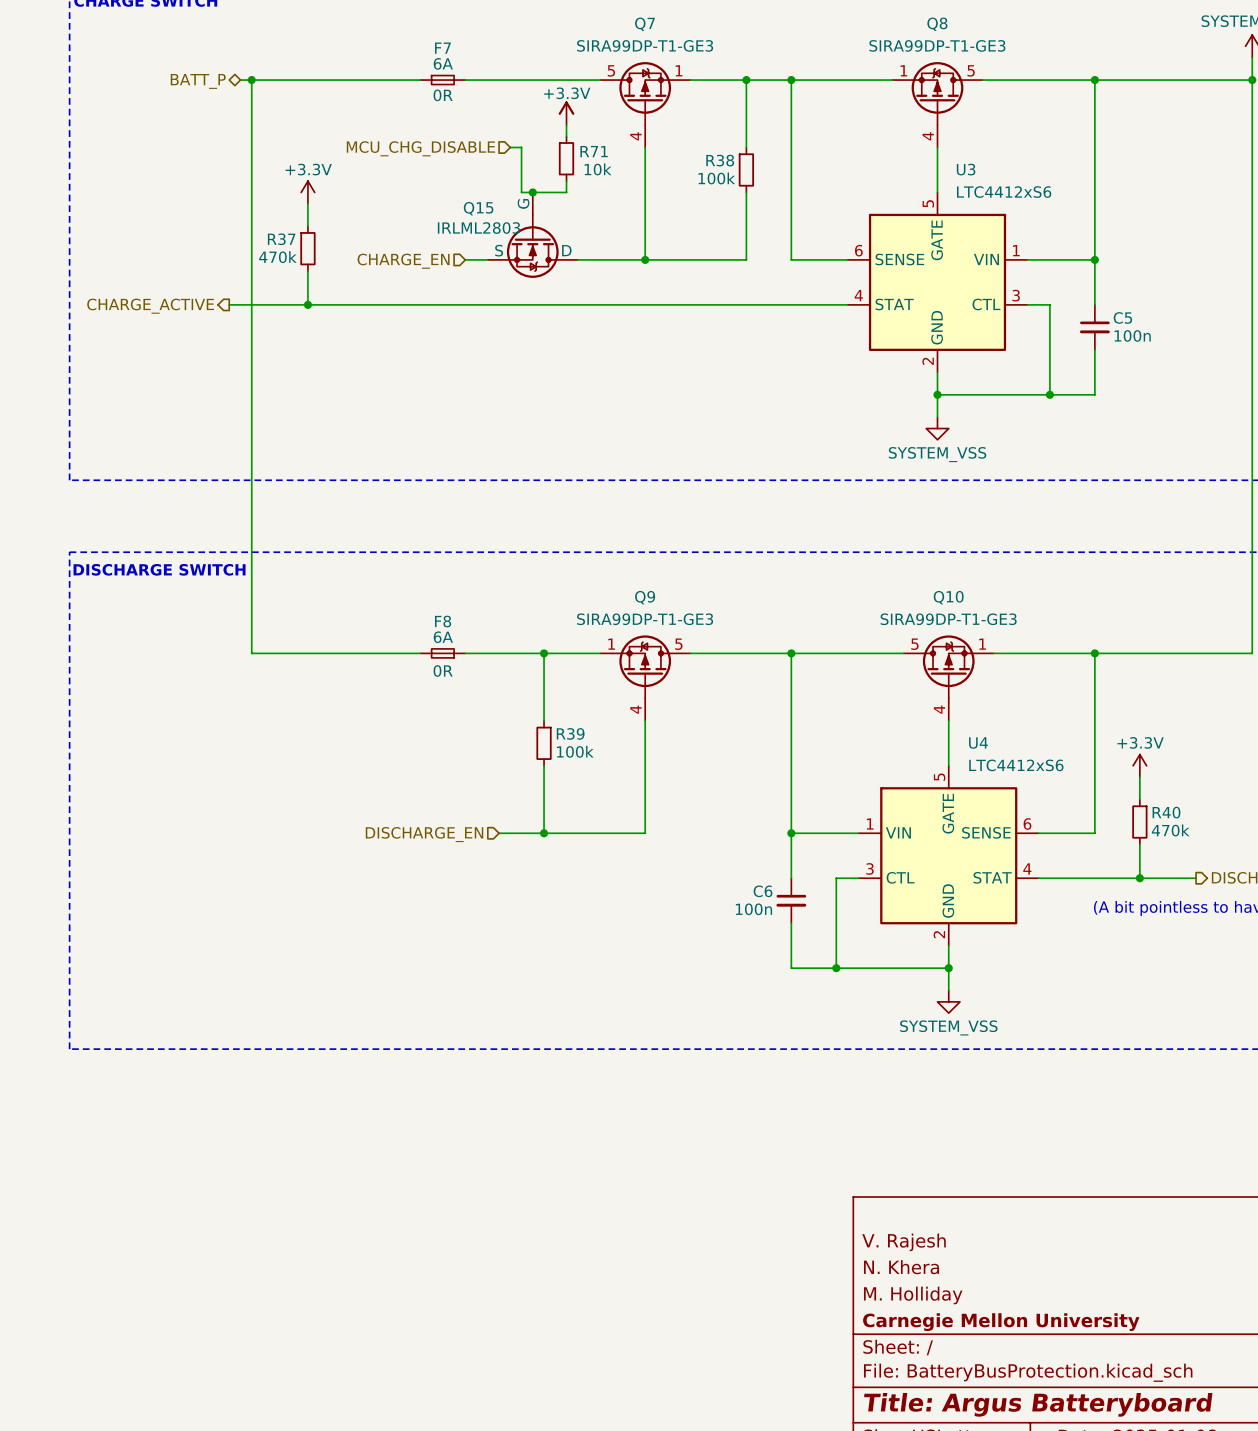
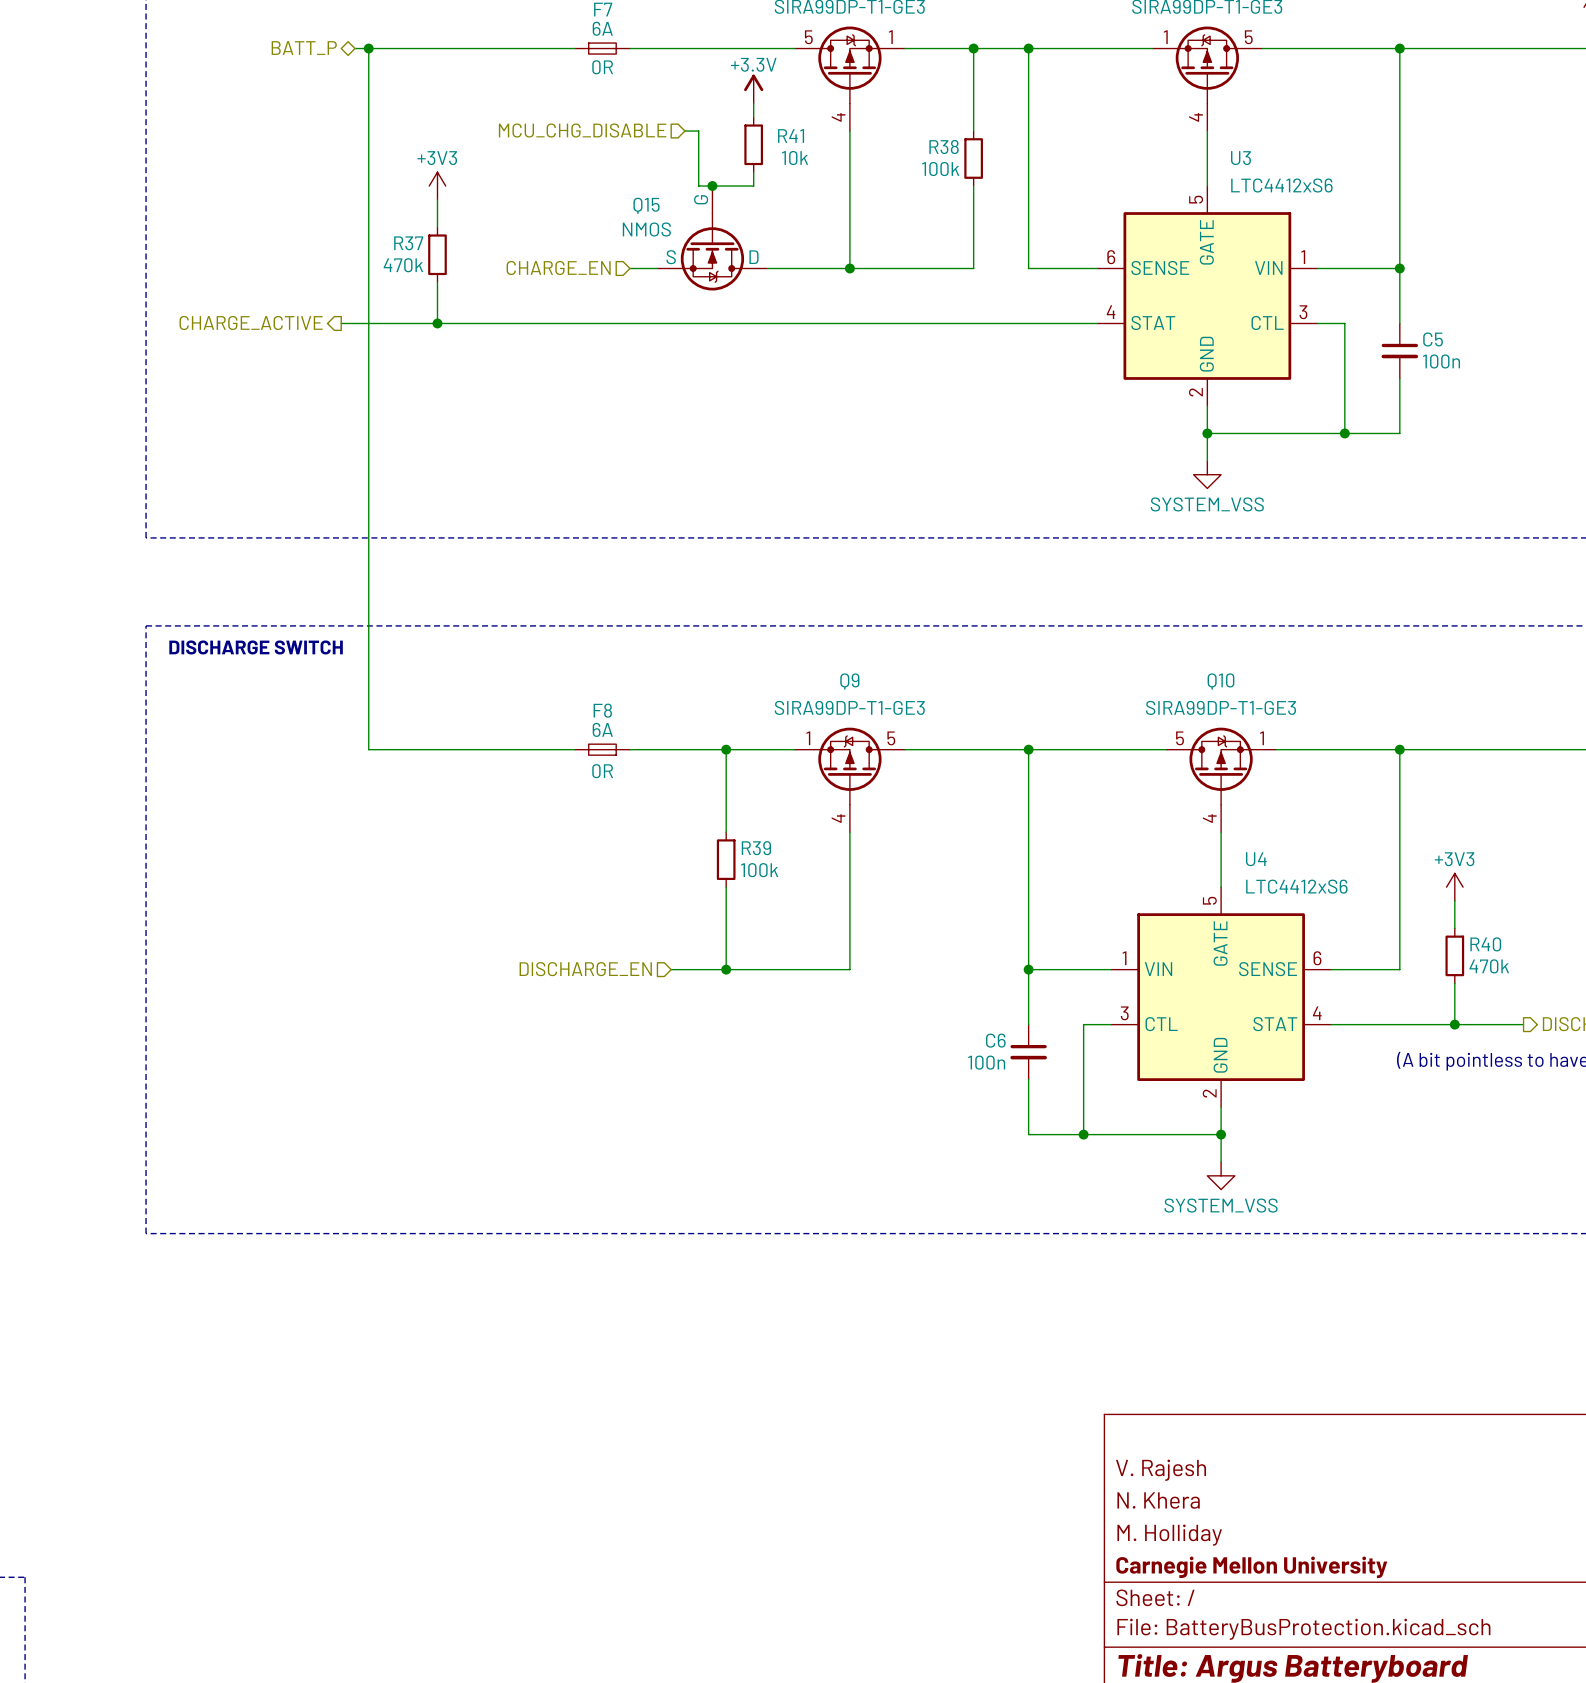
R71 name: R71 (594, 151) -> R41 (791, 136)
power symbol: +3.3V (307, 192) -> +3V3 (437, 186)
Q15 value: IRLML2803 (478, 228) -> NMOS (646, 229)
power symbol: +3.3V (1139, 765) -> +3V3 (1454, 887)

